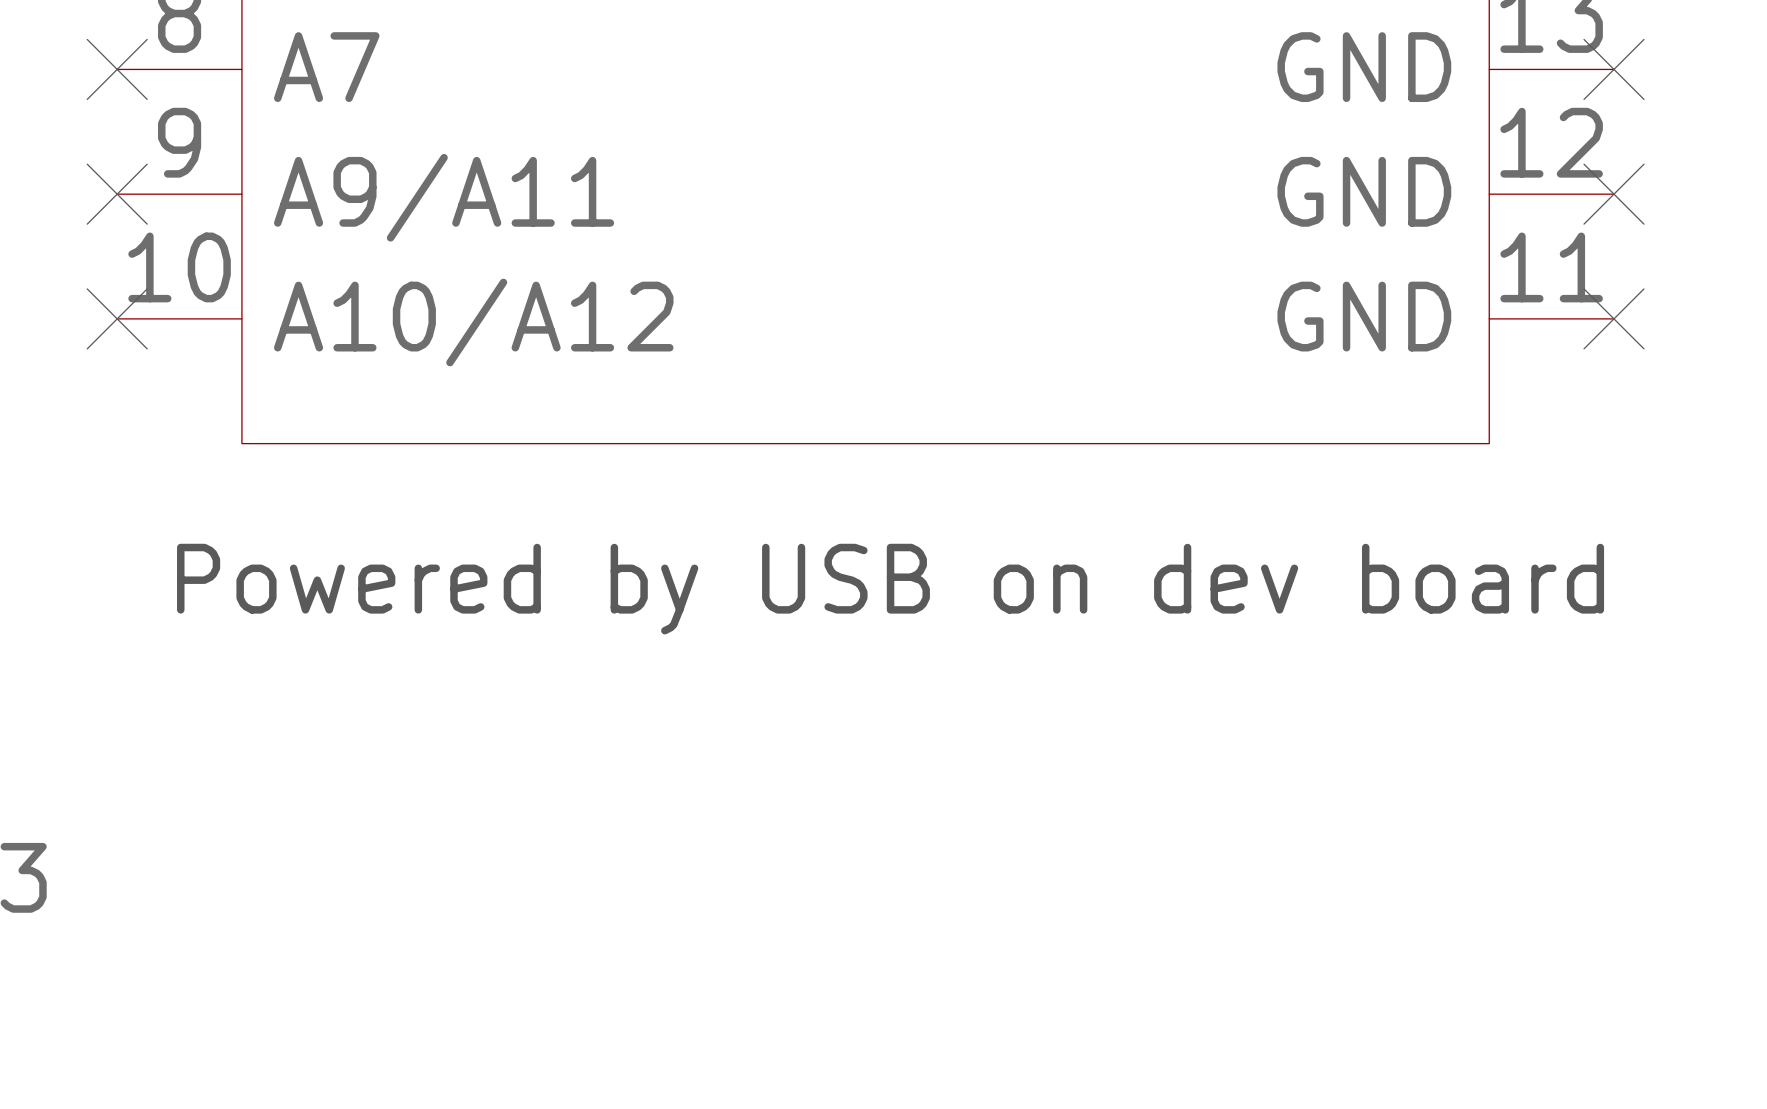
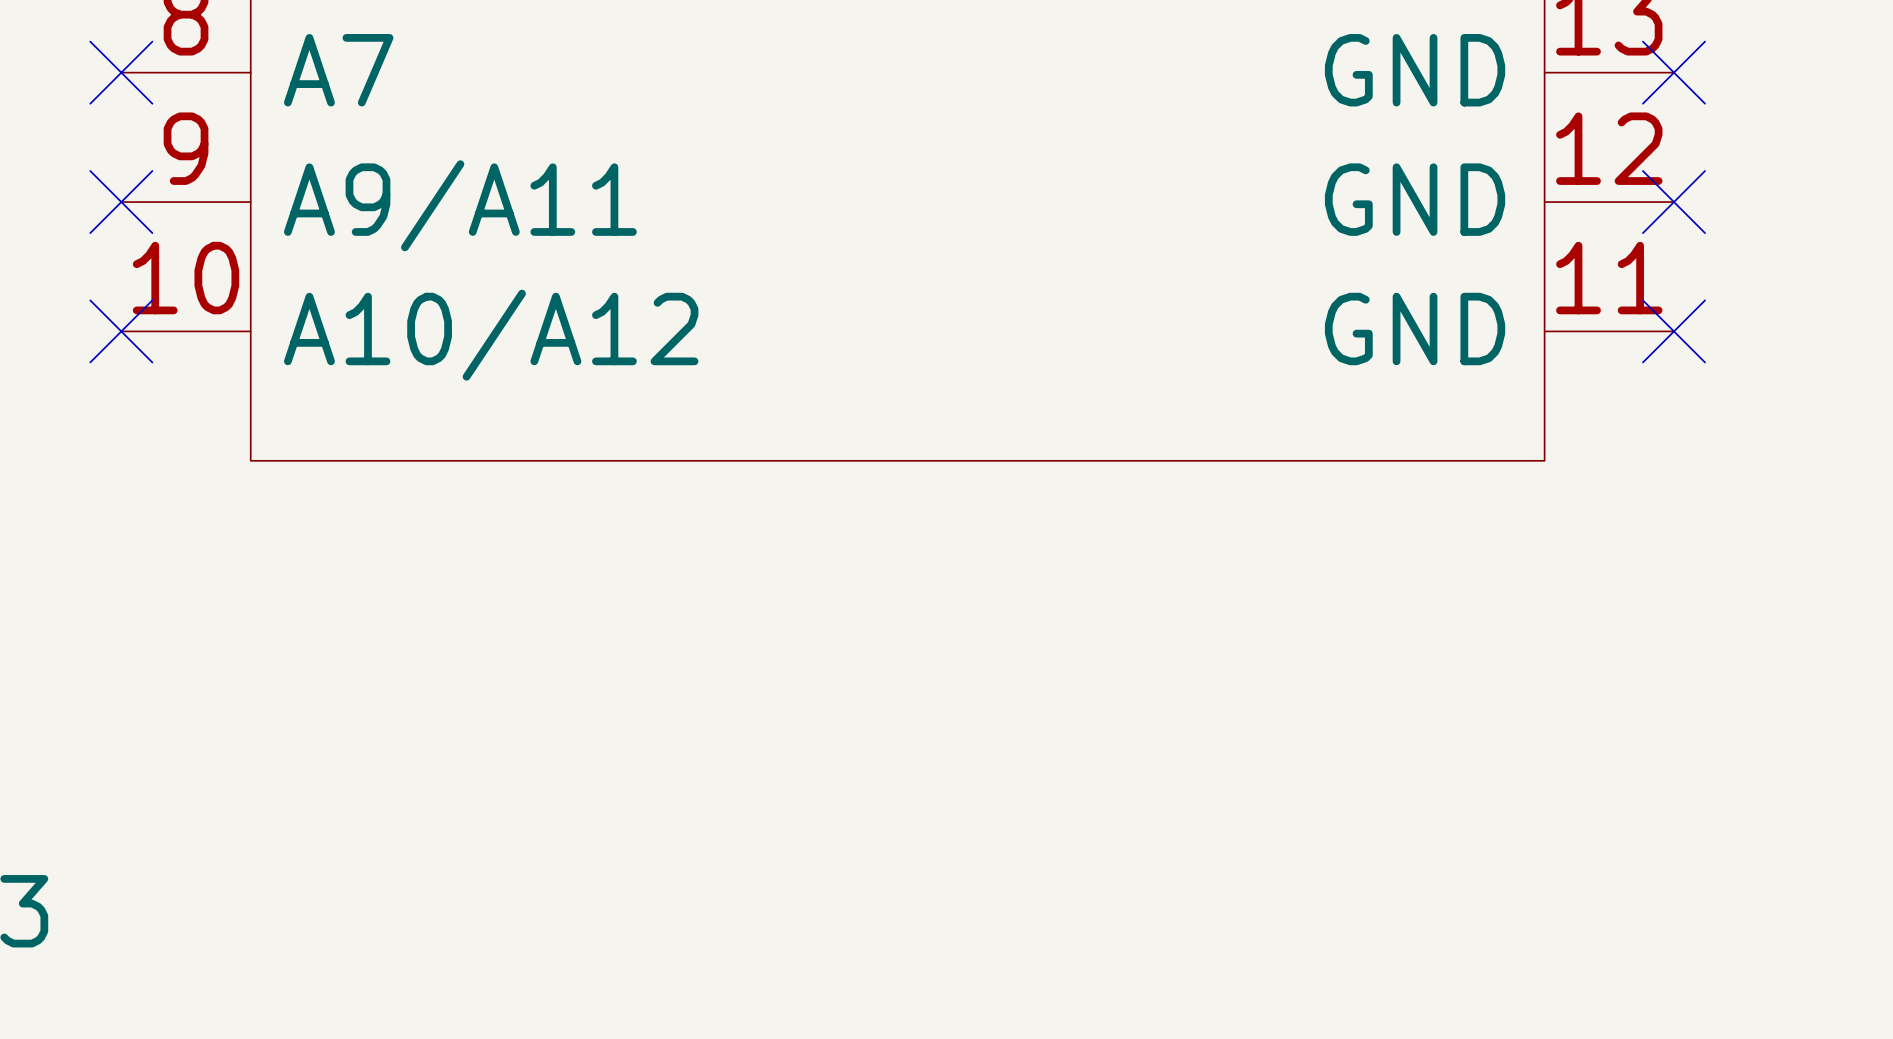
text: Powered by USB on dev board (890, 589) -> none

